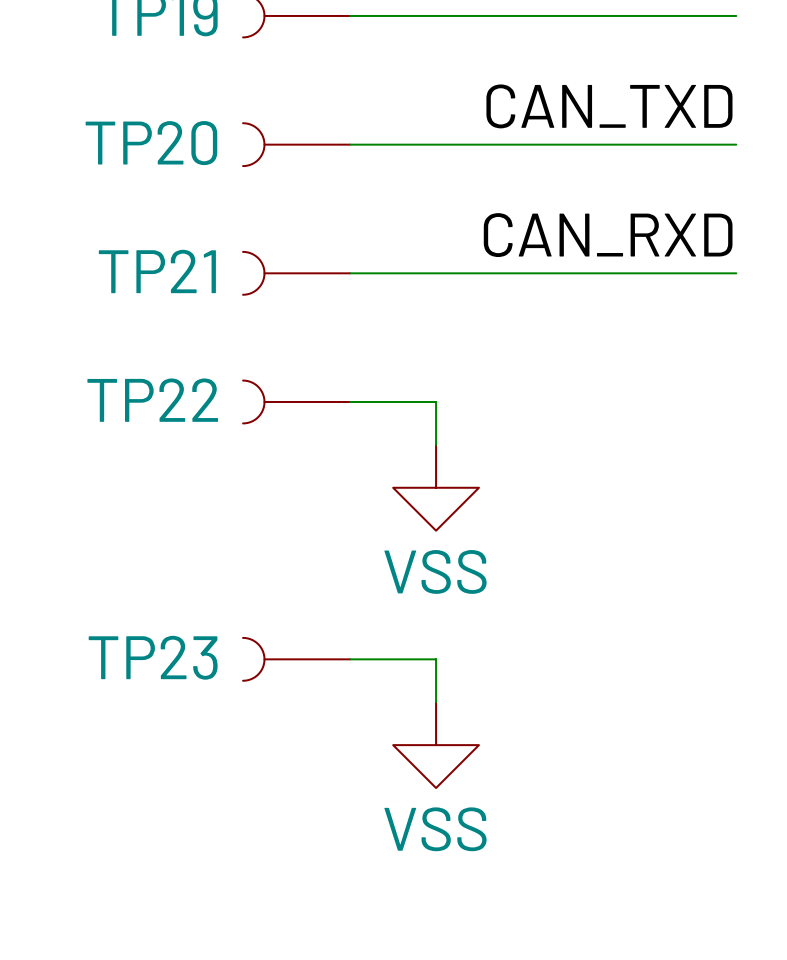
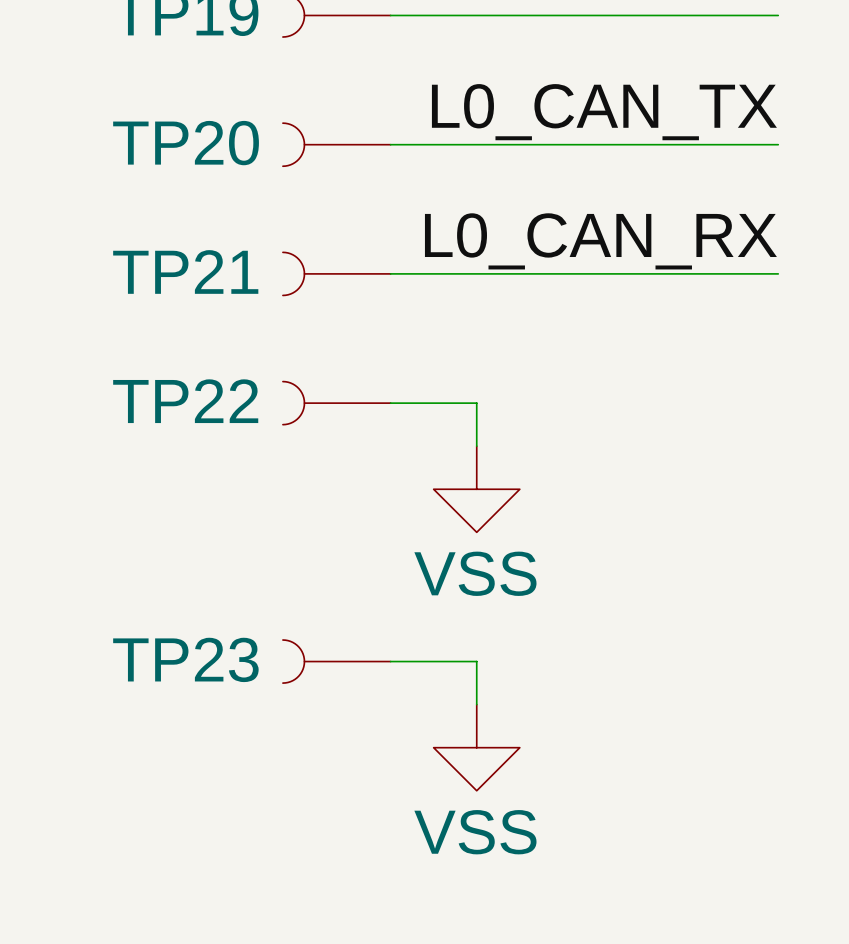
label: CAN_TXD (609, 106) -> L0_CAN_TX (604, 112)
label: CAN_RXD (608, 235) -> L0_CAN_RX (600, 241)

